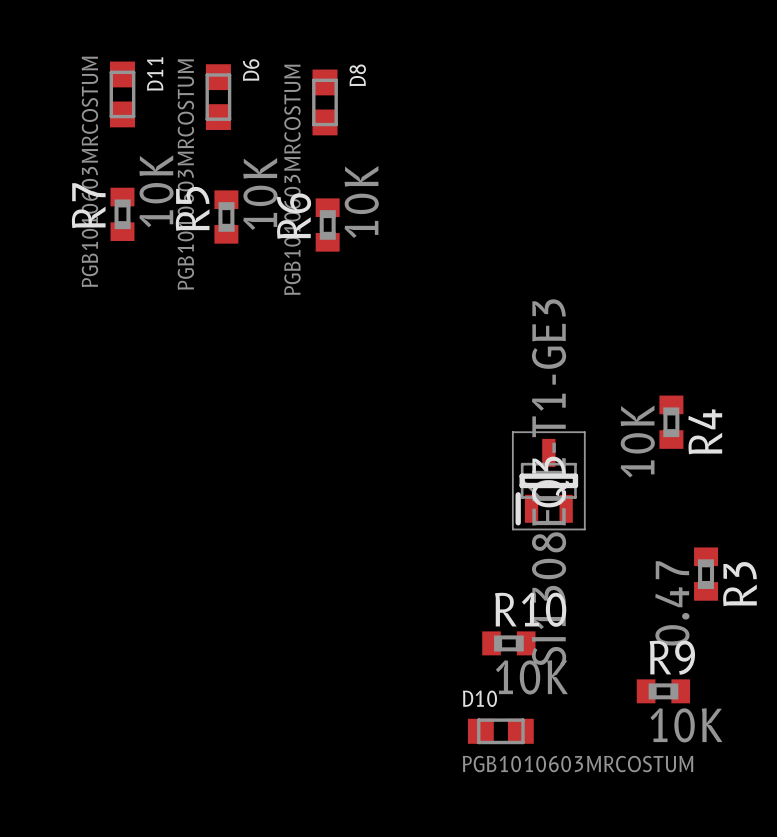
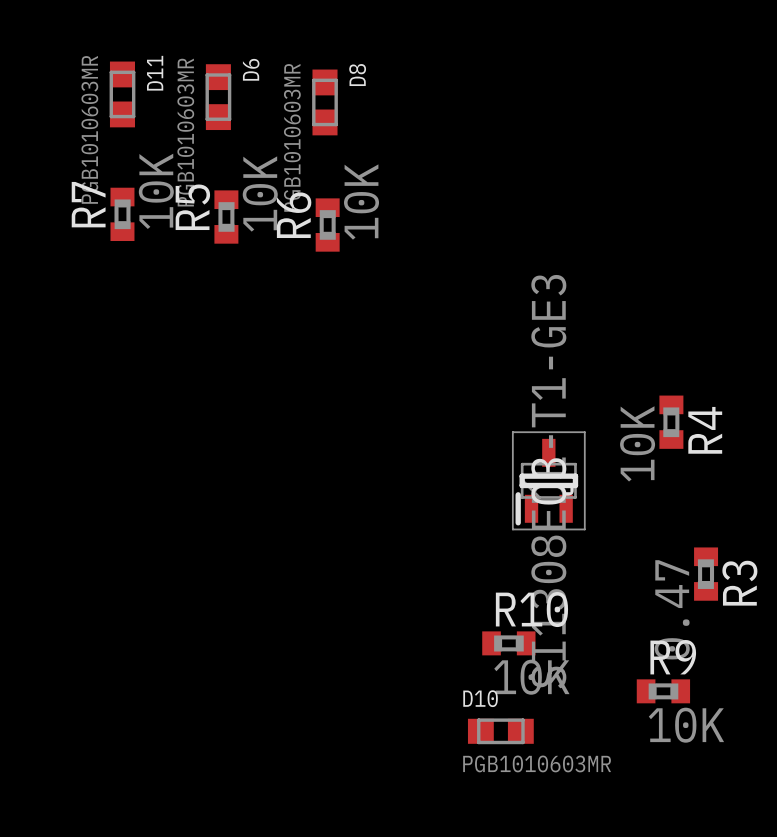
D11 value: PGB1010603MRCOSTUM (89, 171) -> PGB1010603MR (89, 129)
D6 value: PGB1010603MRCOSTUM (185, 174) -> PGB1010603MR (185, 132)
D8 value: PGB1010603MRCOSTUM (292, 179) -> PGB1010603MR (292, 137)
D10 value: PGB1010603MRCOSTUM (577, 764) -> PGB1010603MR (537, 763)

